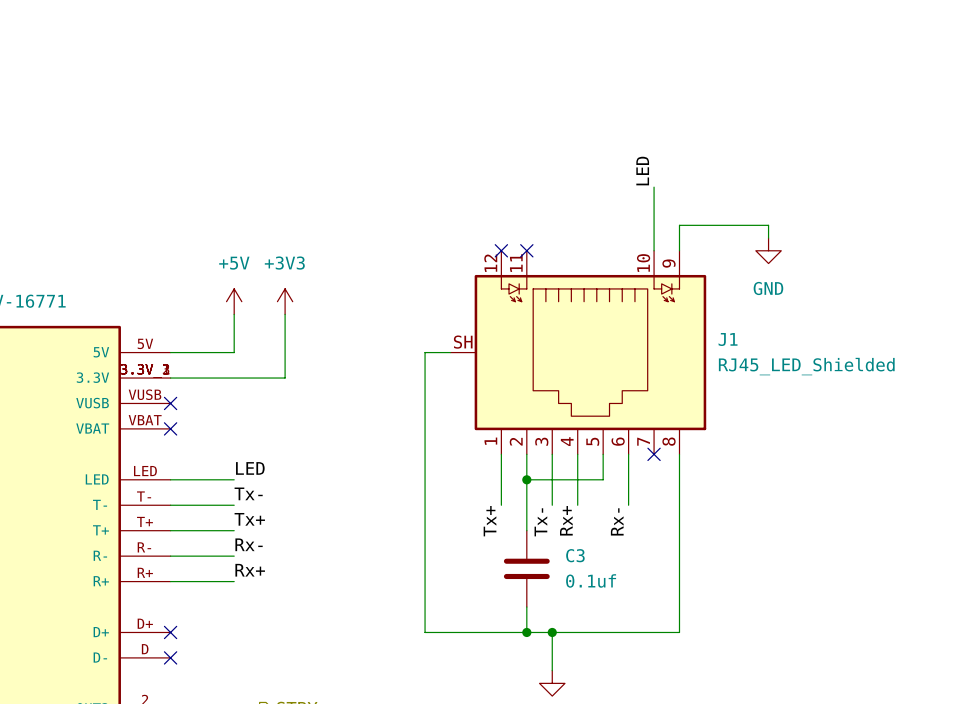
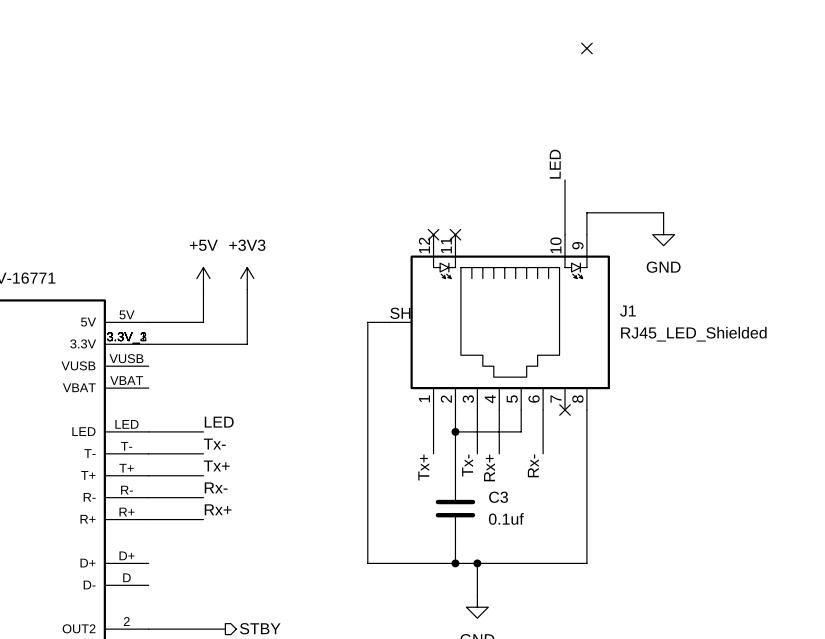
no-connect mark: none -> (586, 48)
no-connect mark: (170, 403) -> none
no-connect mark: (170, 428) -> none
no-connect mark: (170, 632) -> none
no-connect mark: (170, 657) -> none

